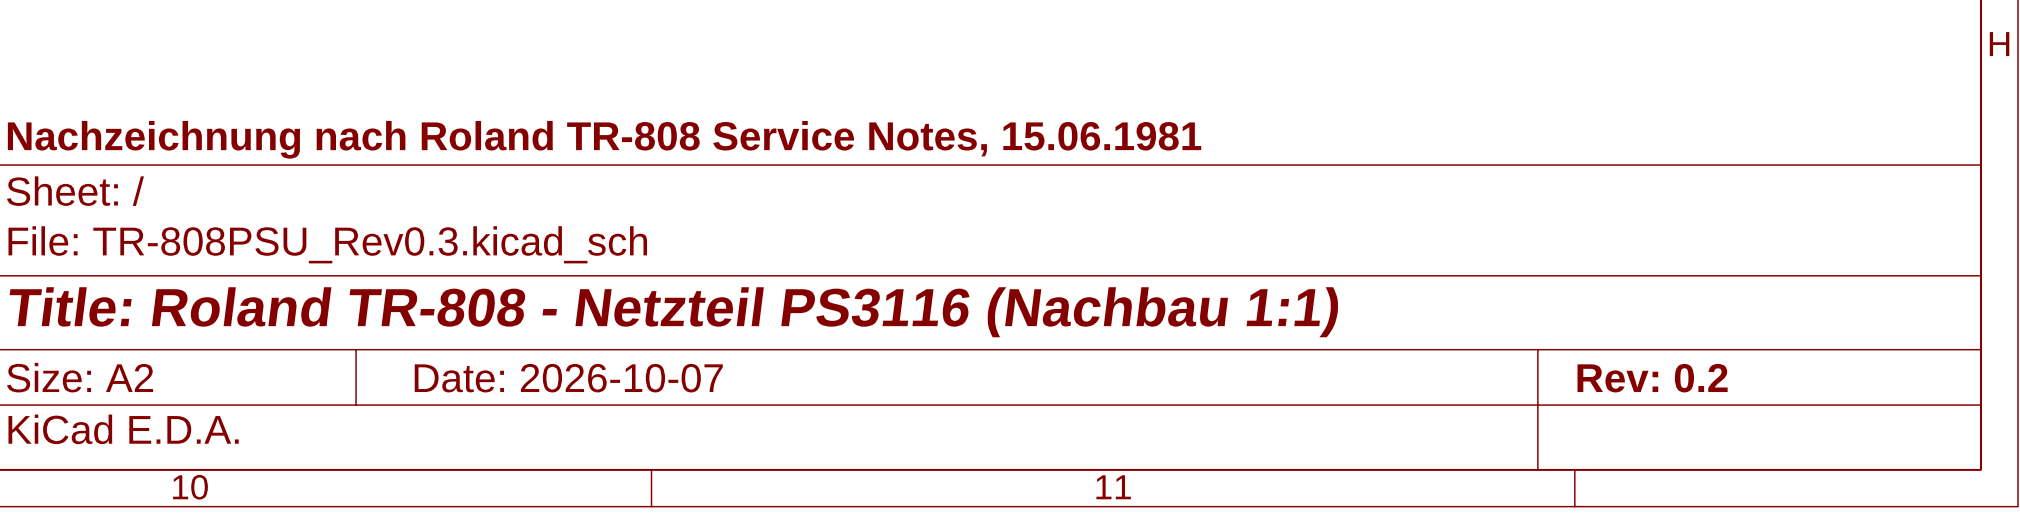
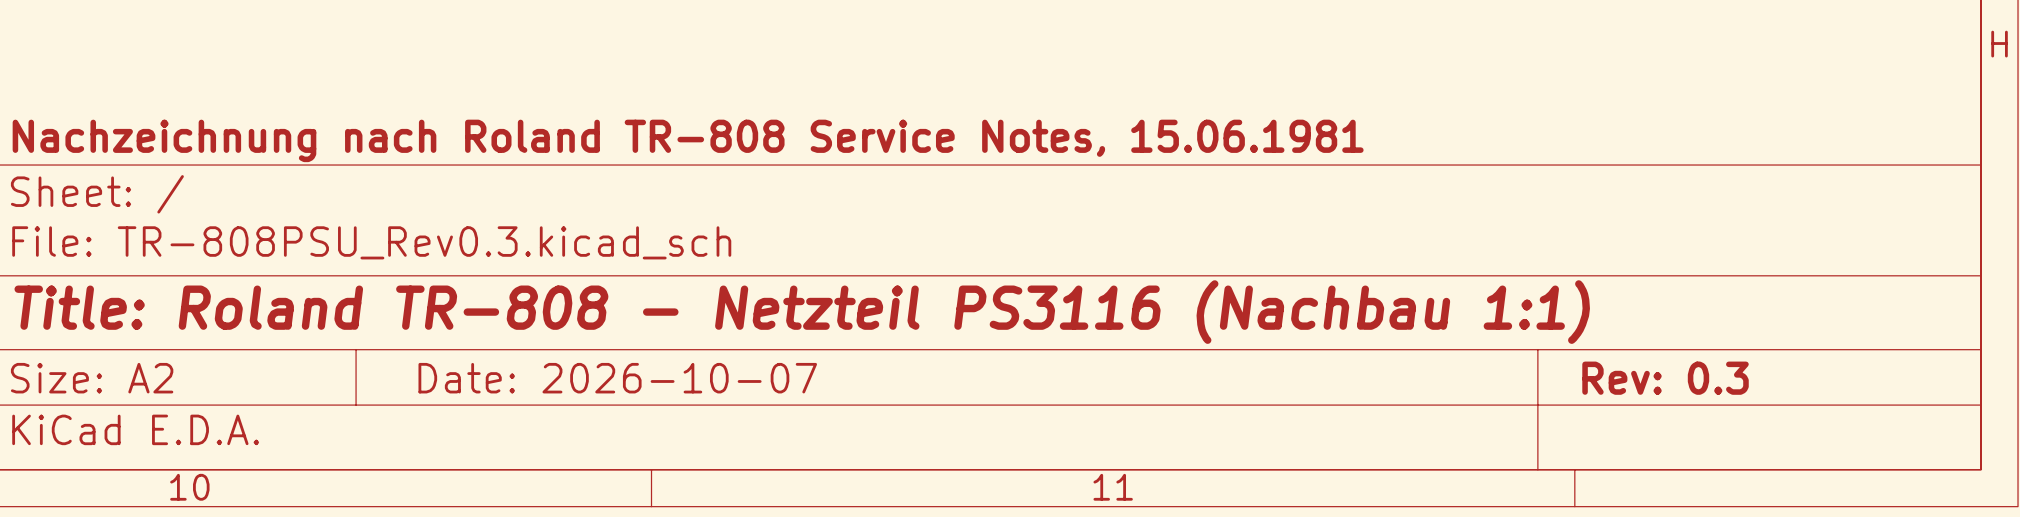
title block: Rev: 0.2 (1652, 378) -> Rev: 0.3 (1665, 378)

